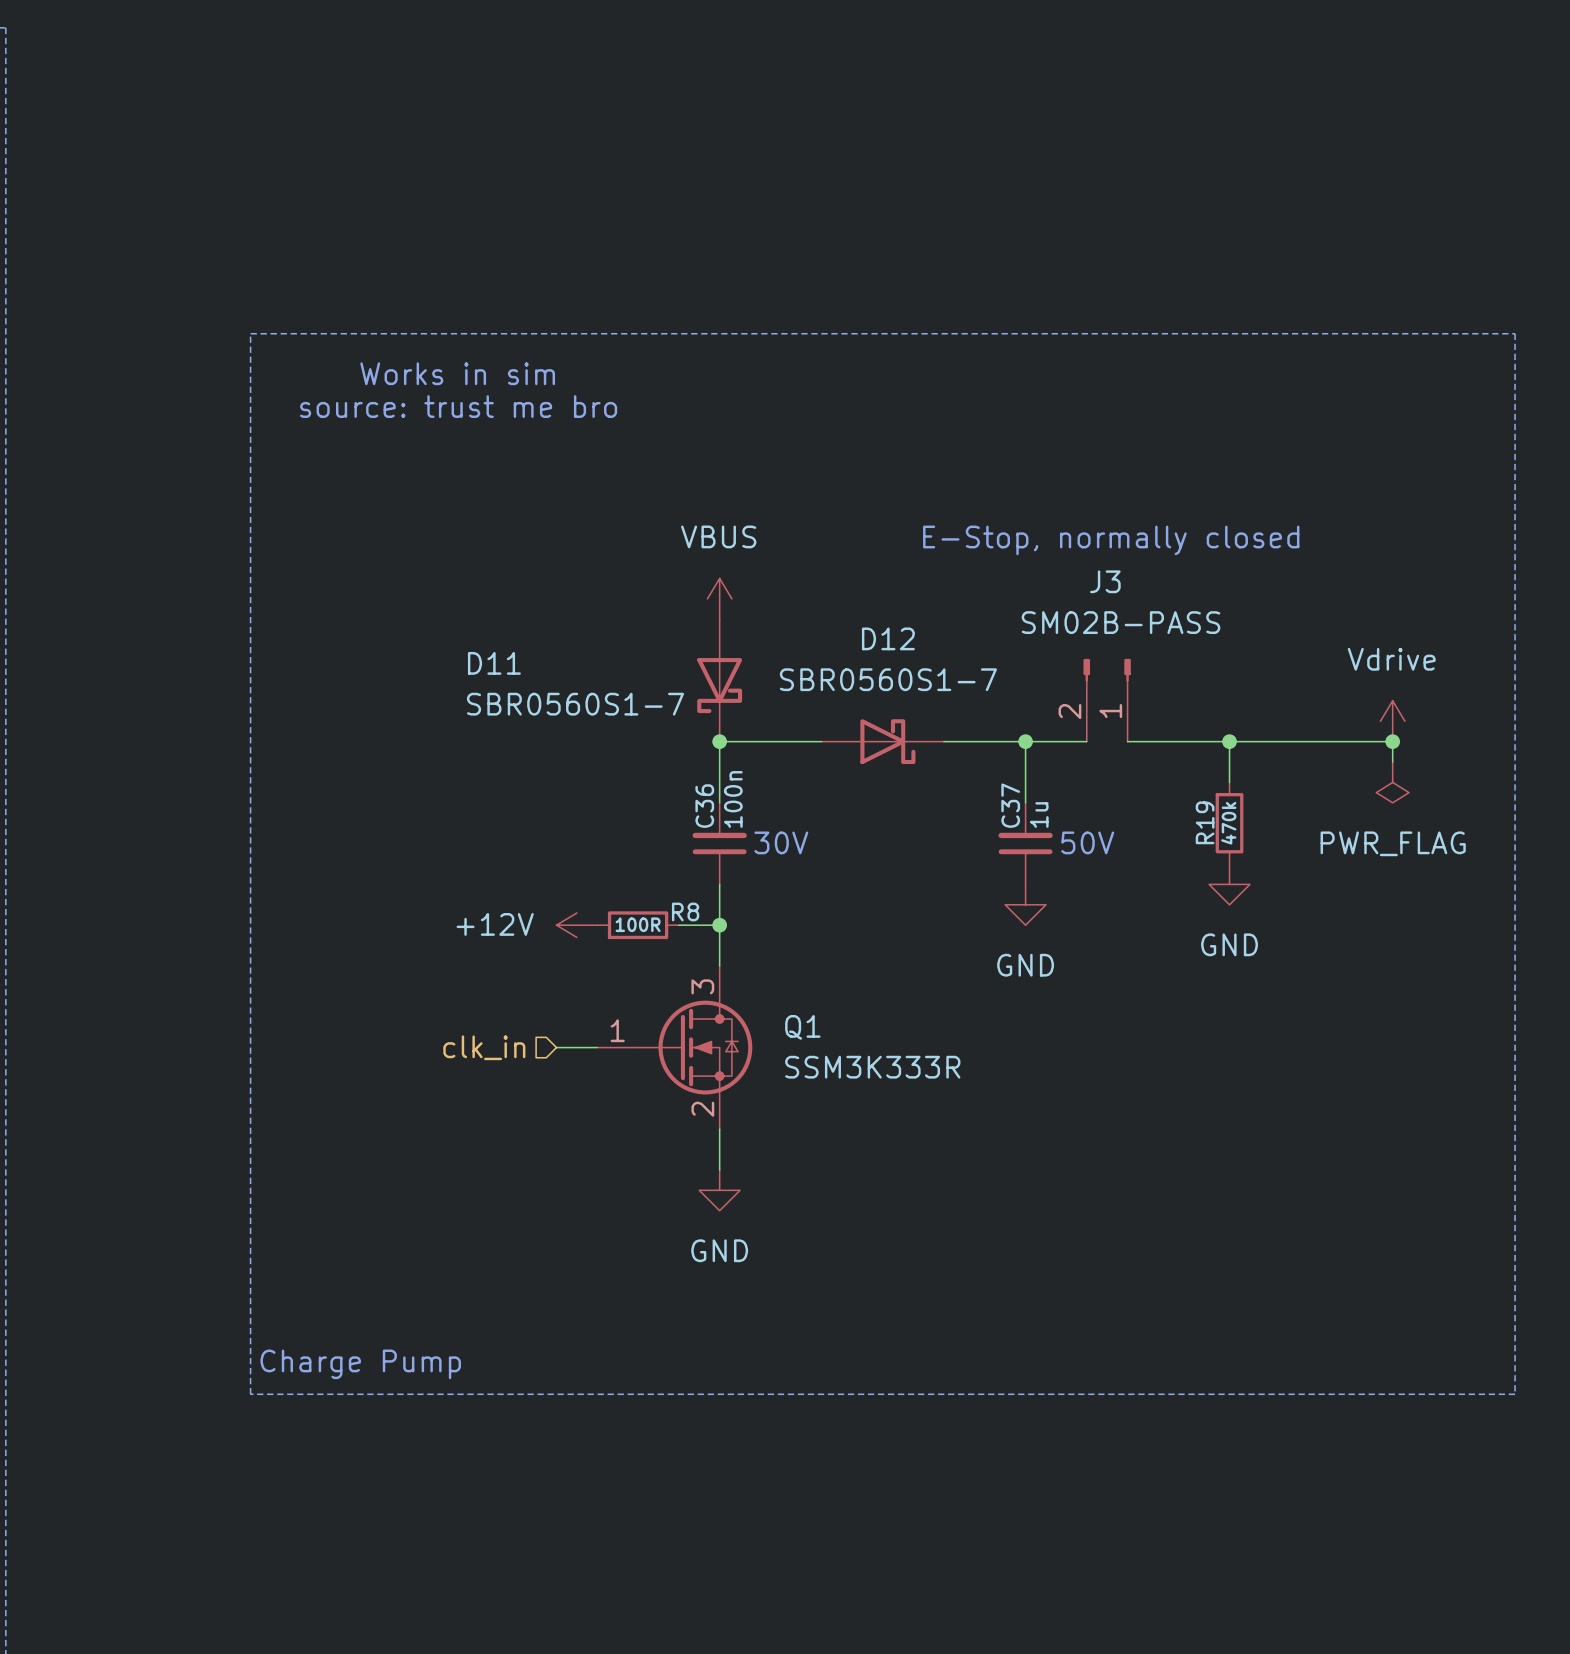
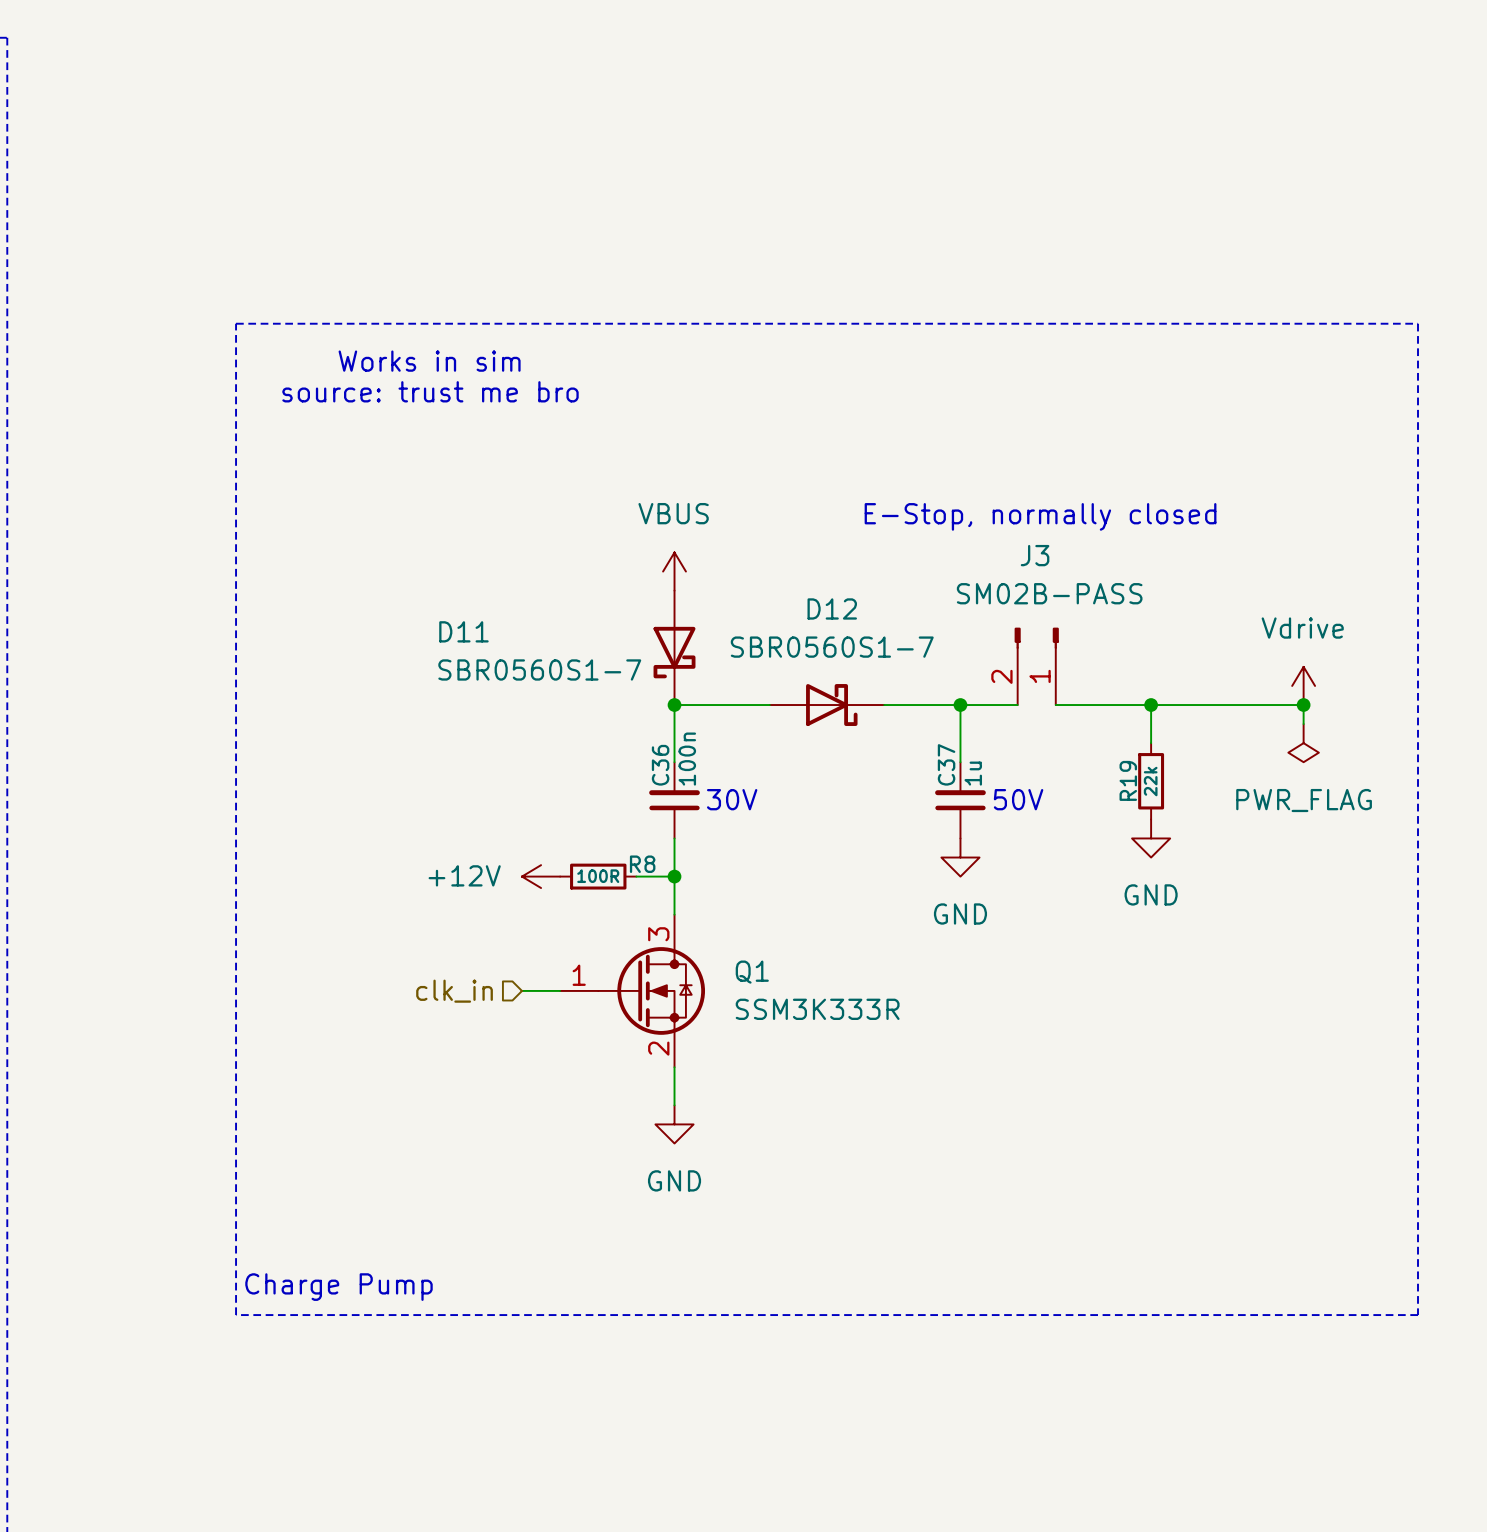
R19 value: 470k (1228, 823) -> 22k (1150, 781)

